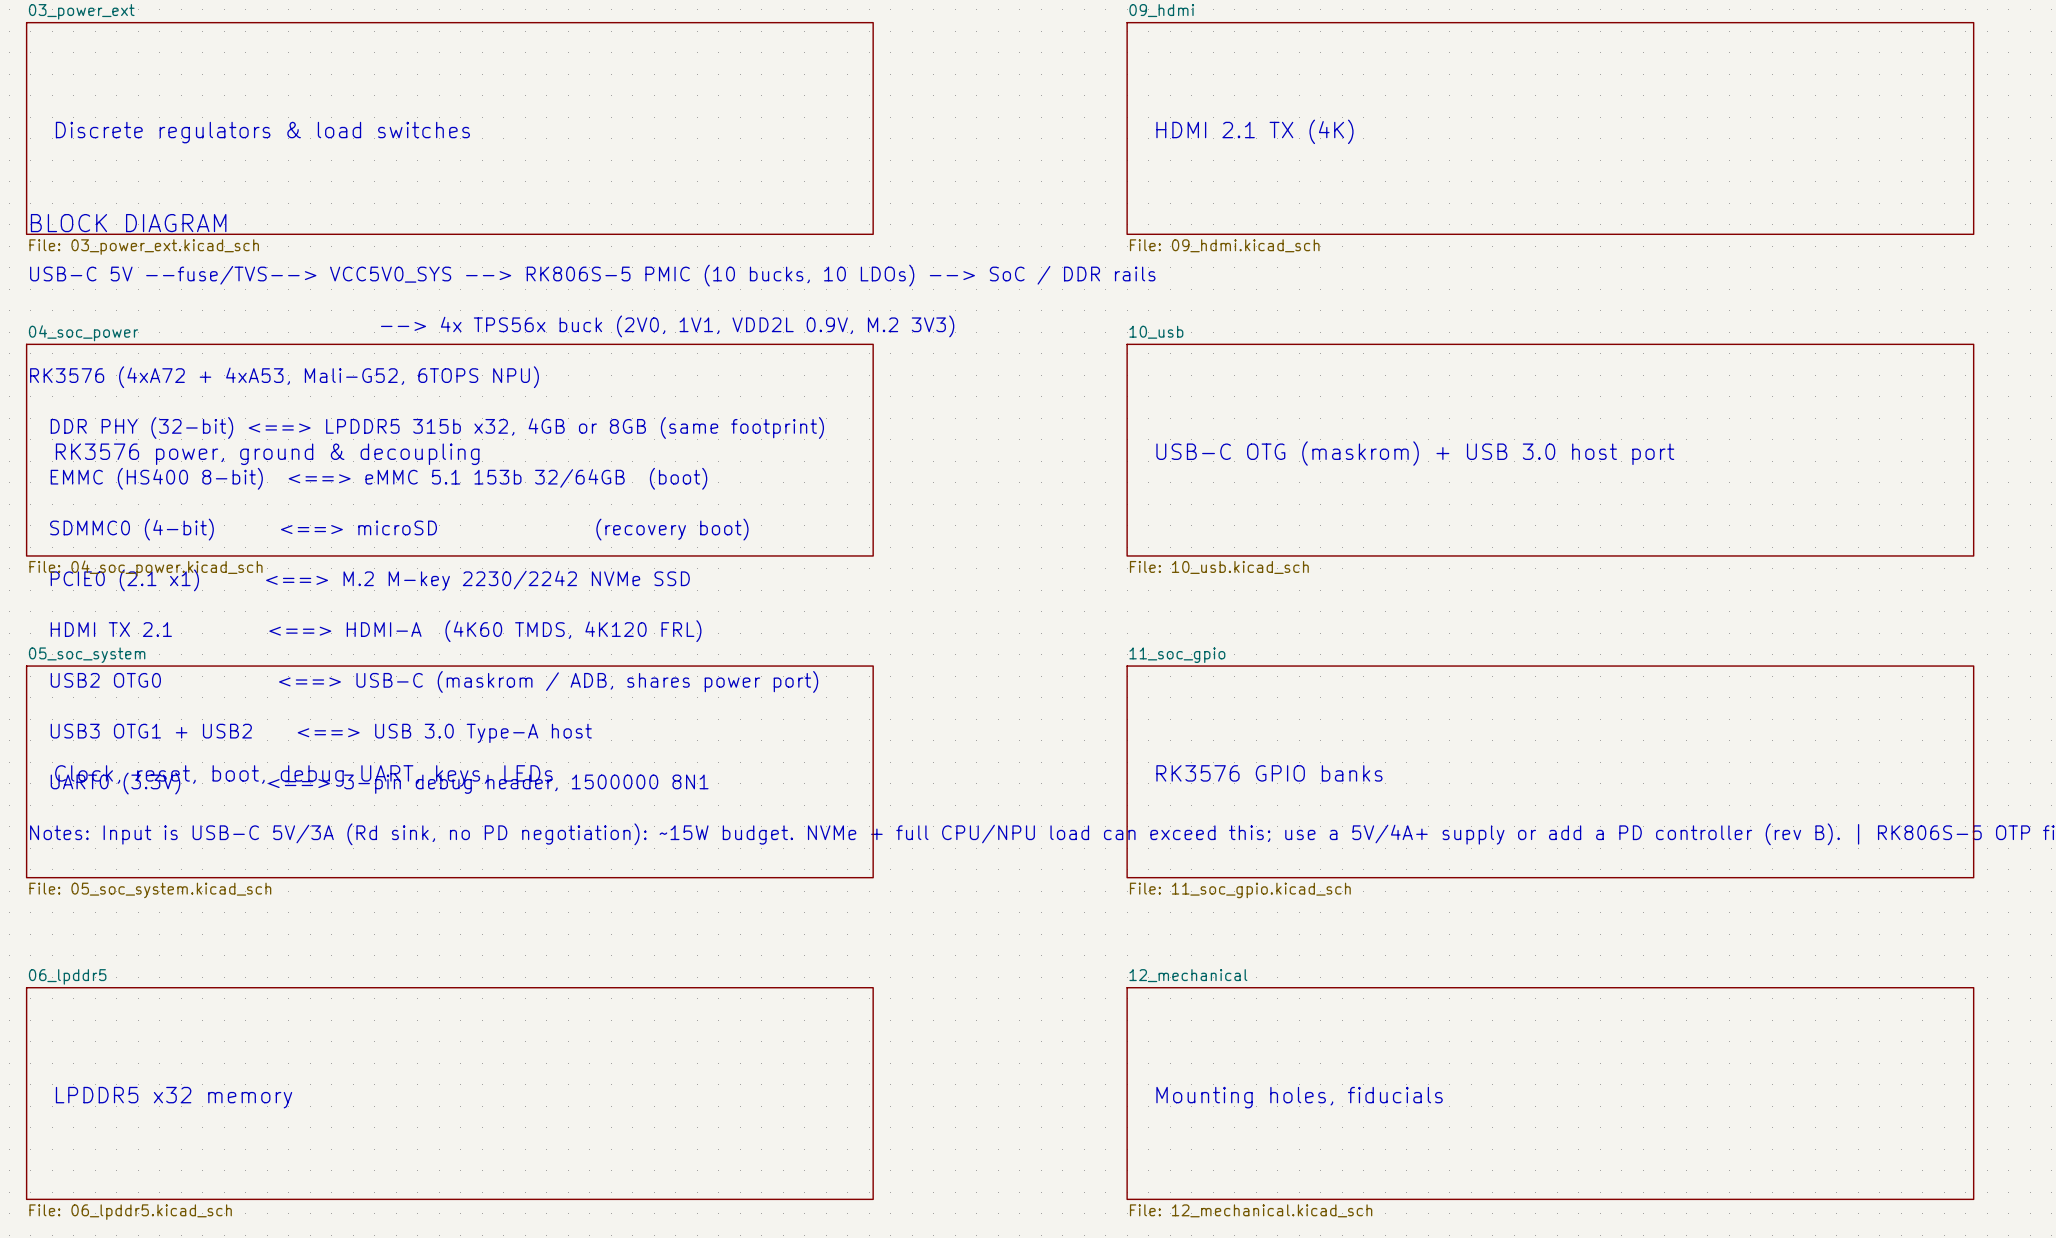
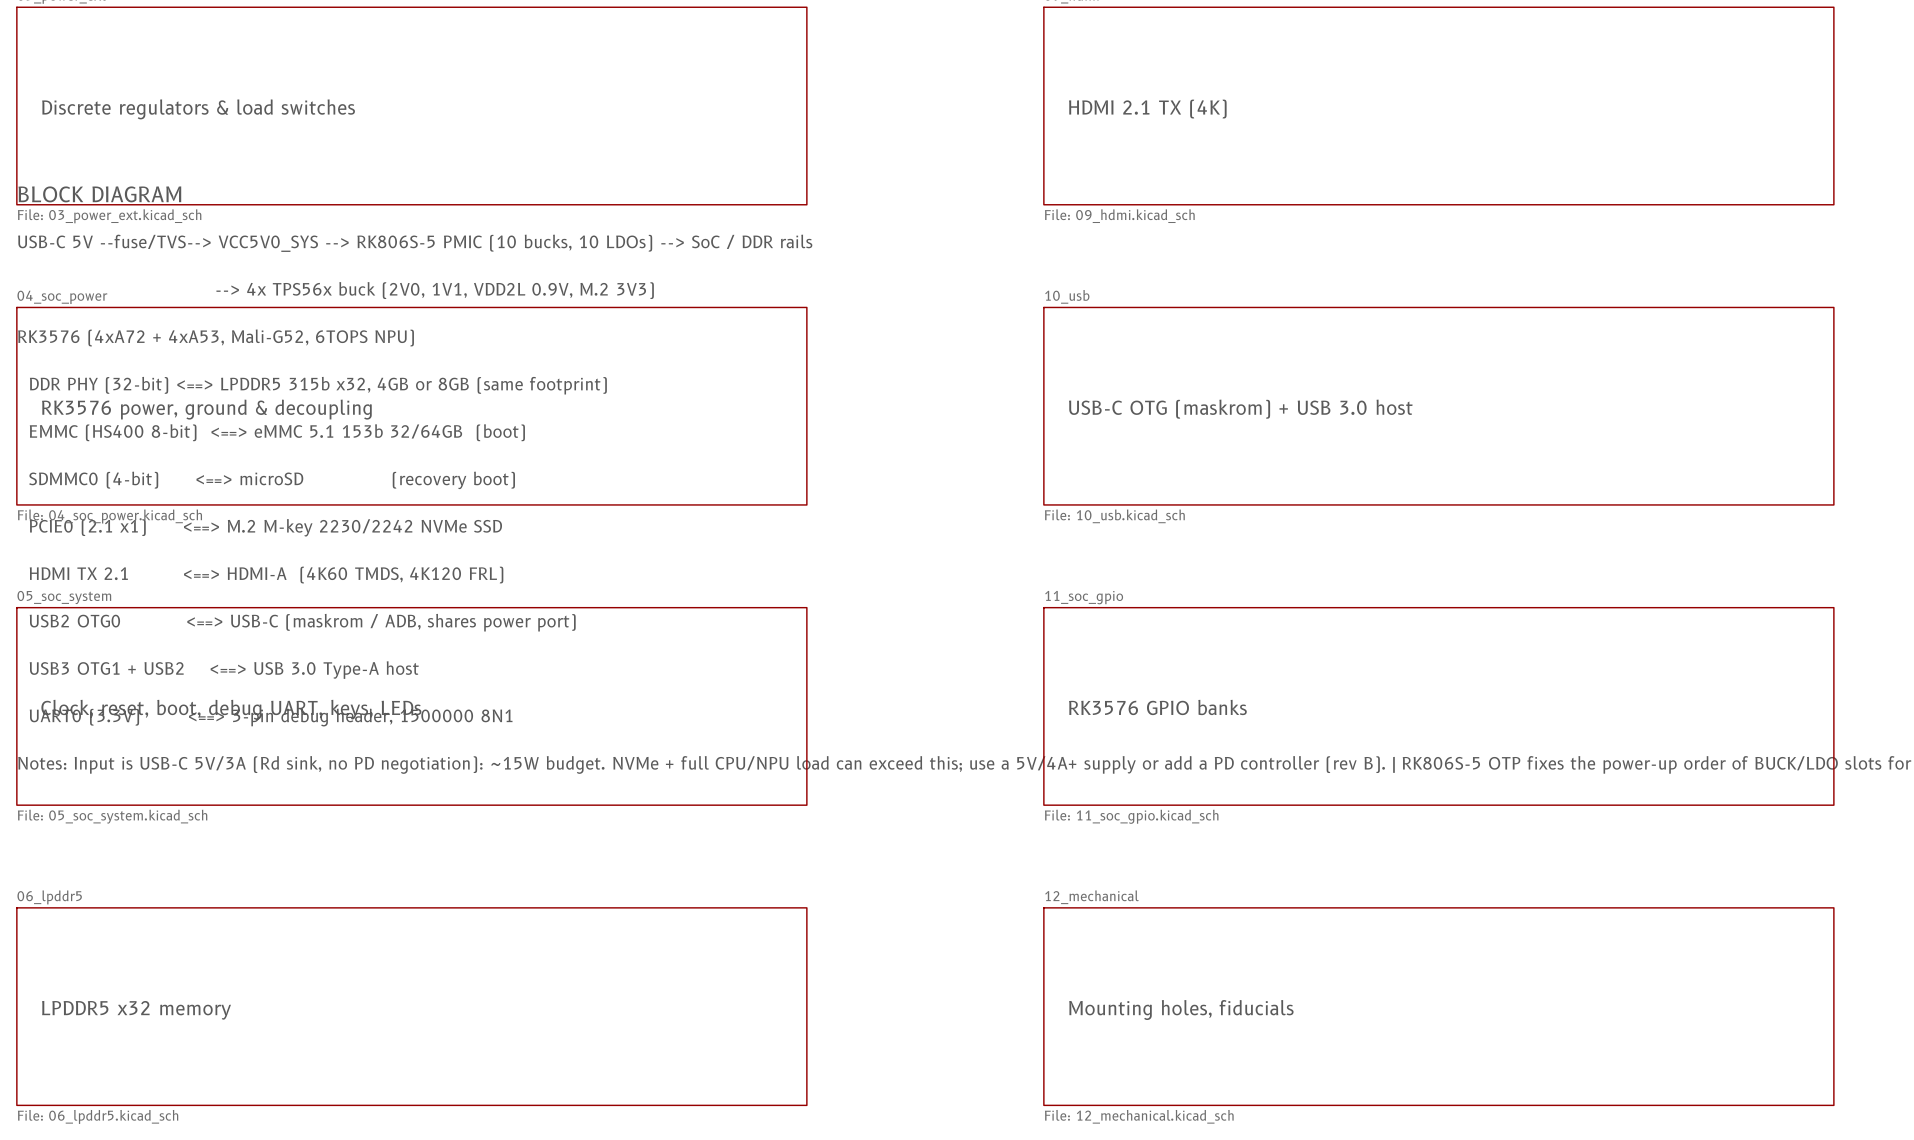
text: USB-C OTG (maskrom) + USB 3.0 host port (1415, 453) -> USB-C OTG (maskrom) + USB 3.0 host (1240, 409)

